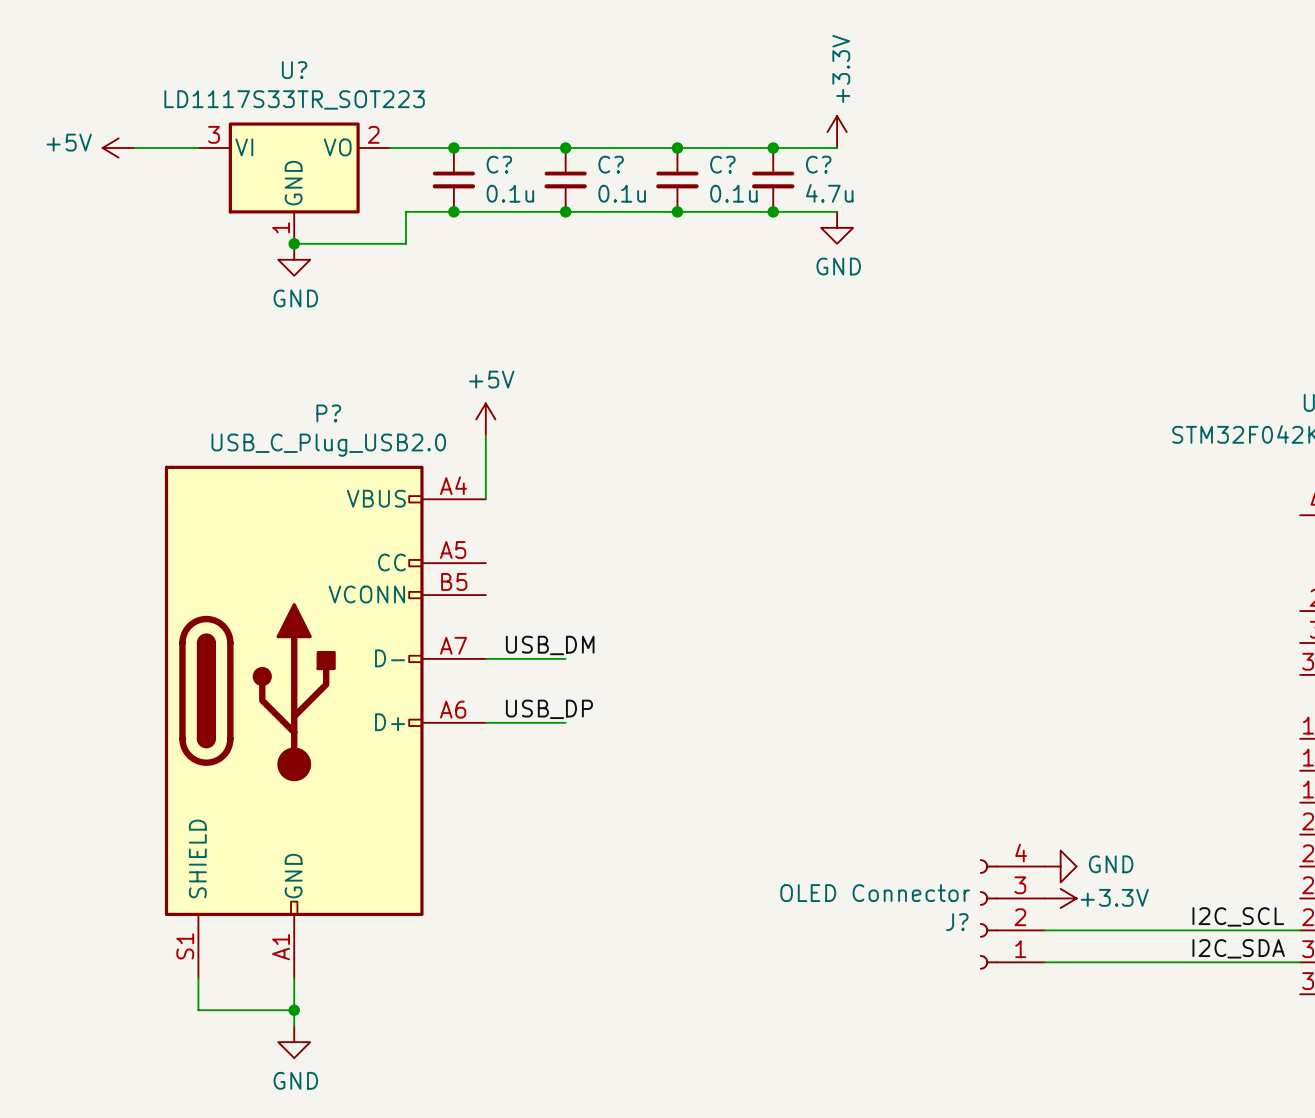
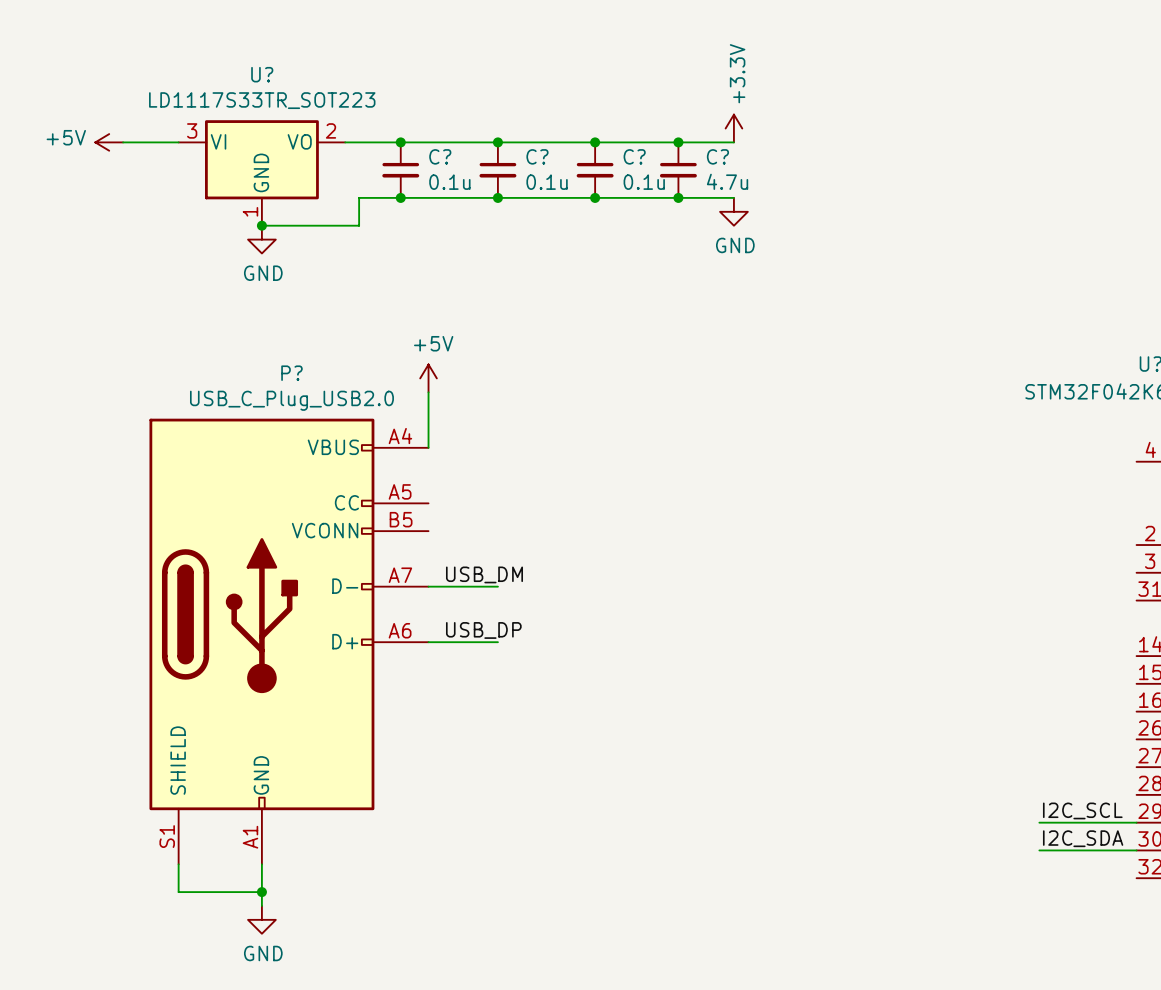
power symbol: GND (1060, 866) -> none
power symbol: +3.3V (1060, 898) -> none
J?: OLED Connector (1012, 914) -> none
wire: (1044, 930) (1188, 930) -> none
wire: (1044, 962) (1188, 962) -> none

